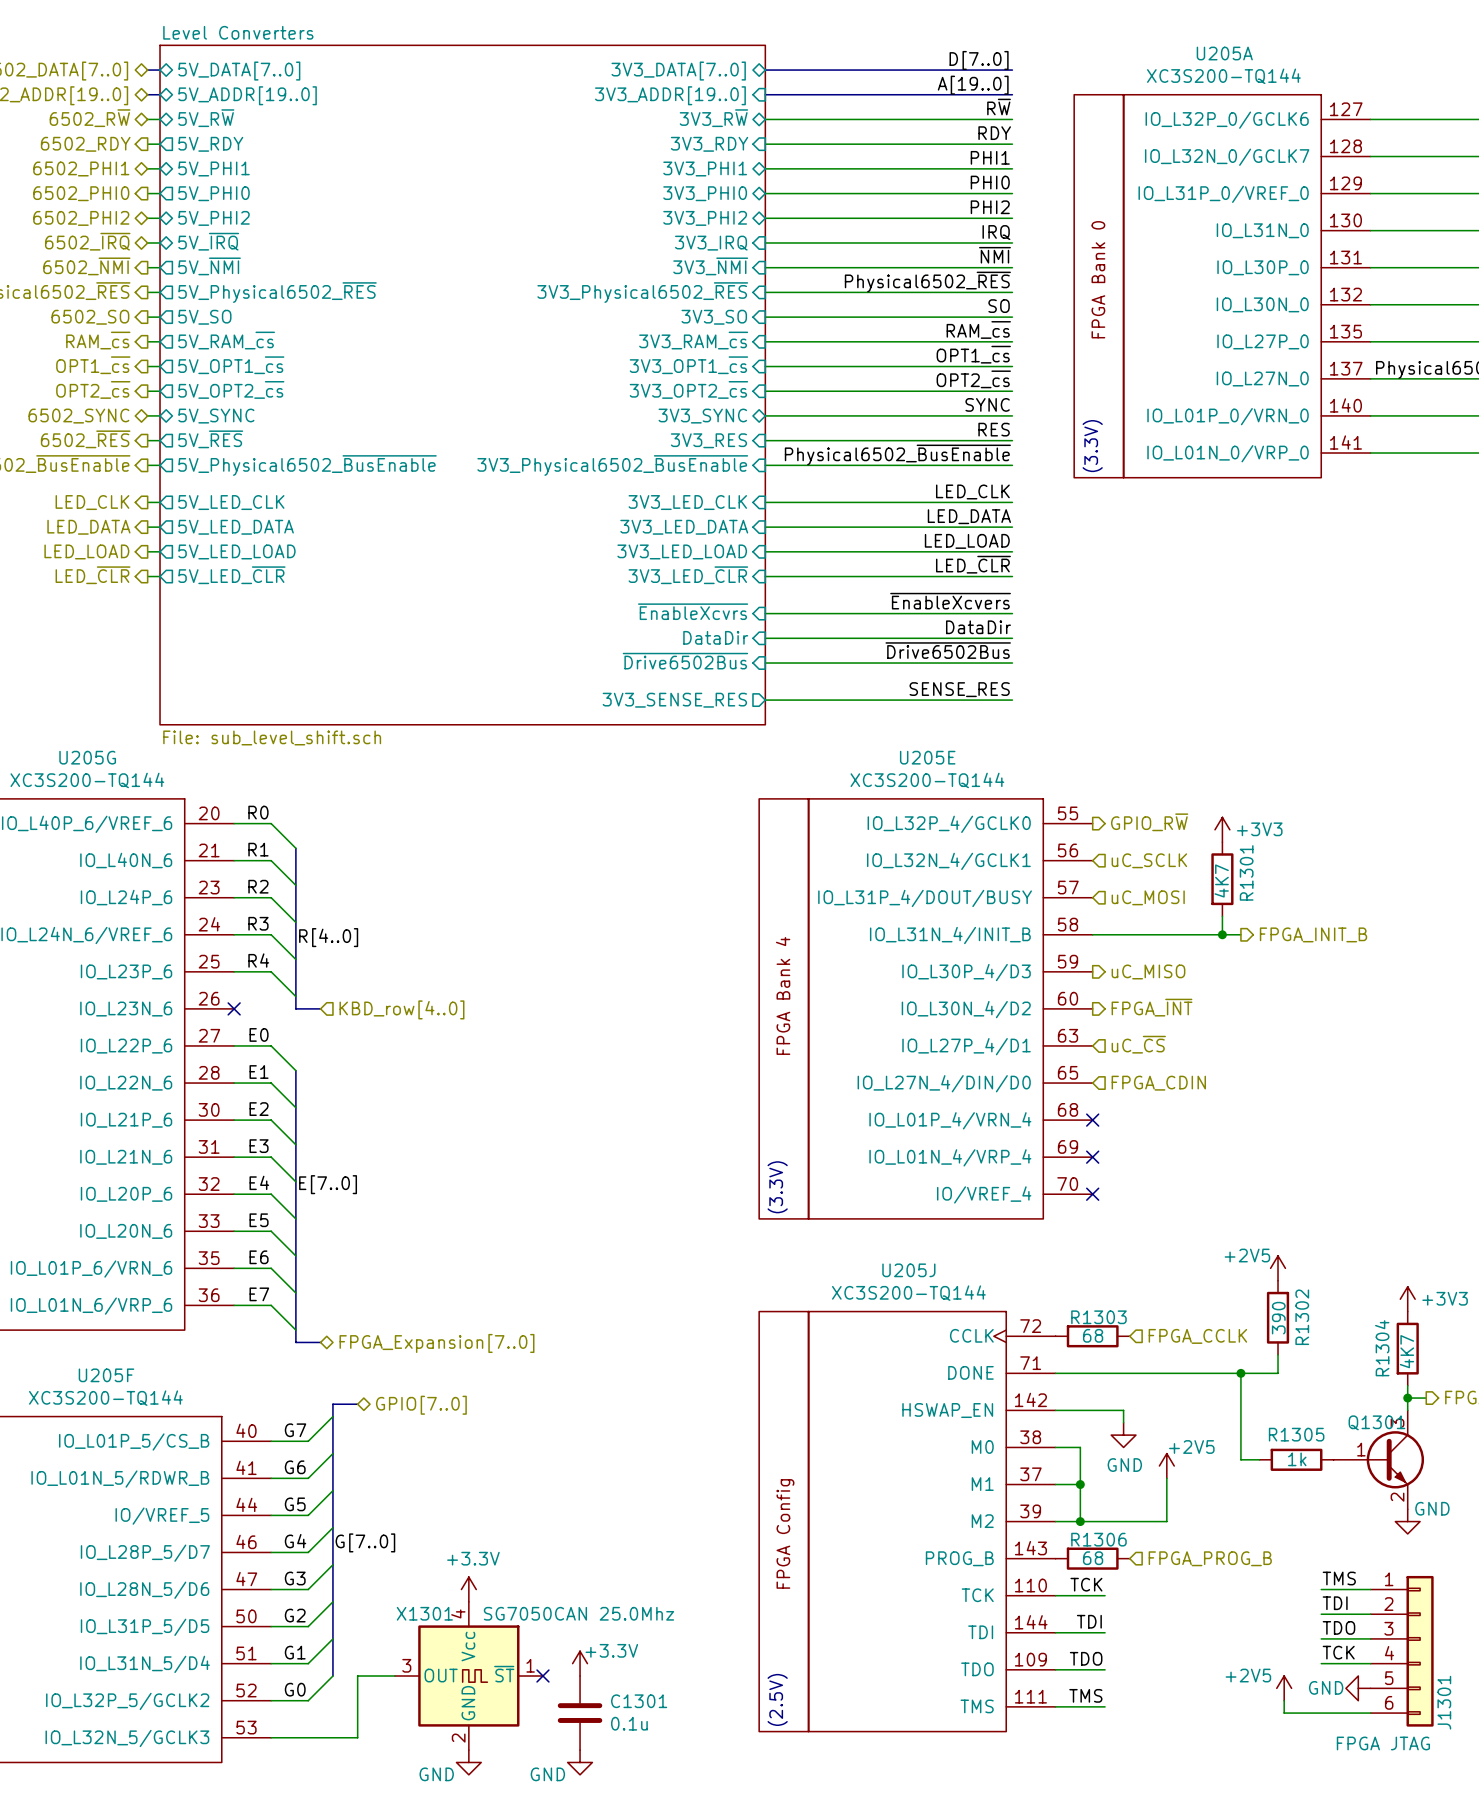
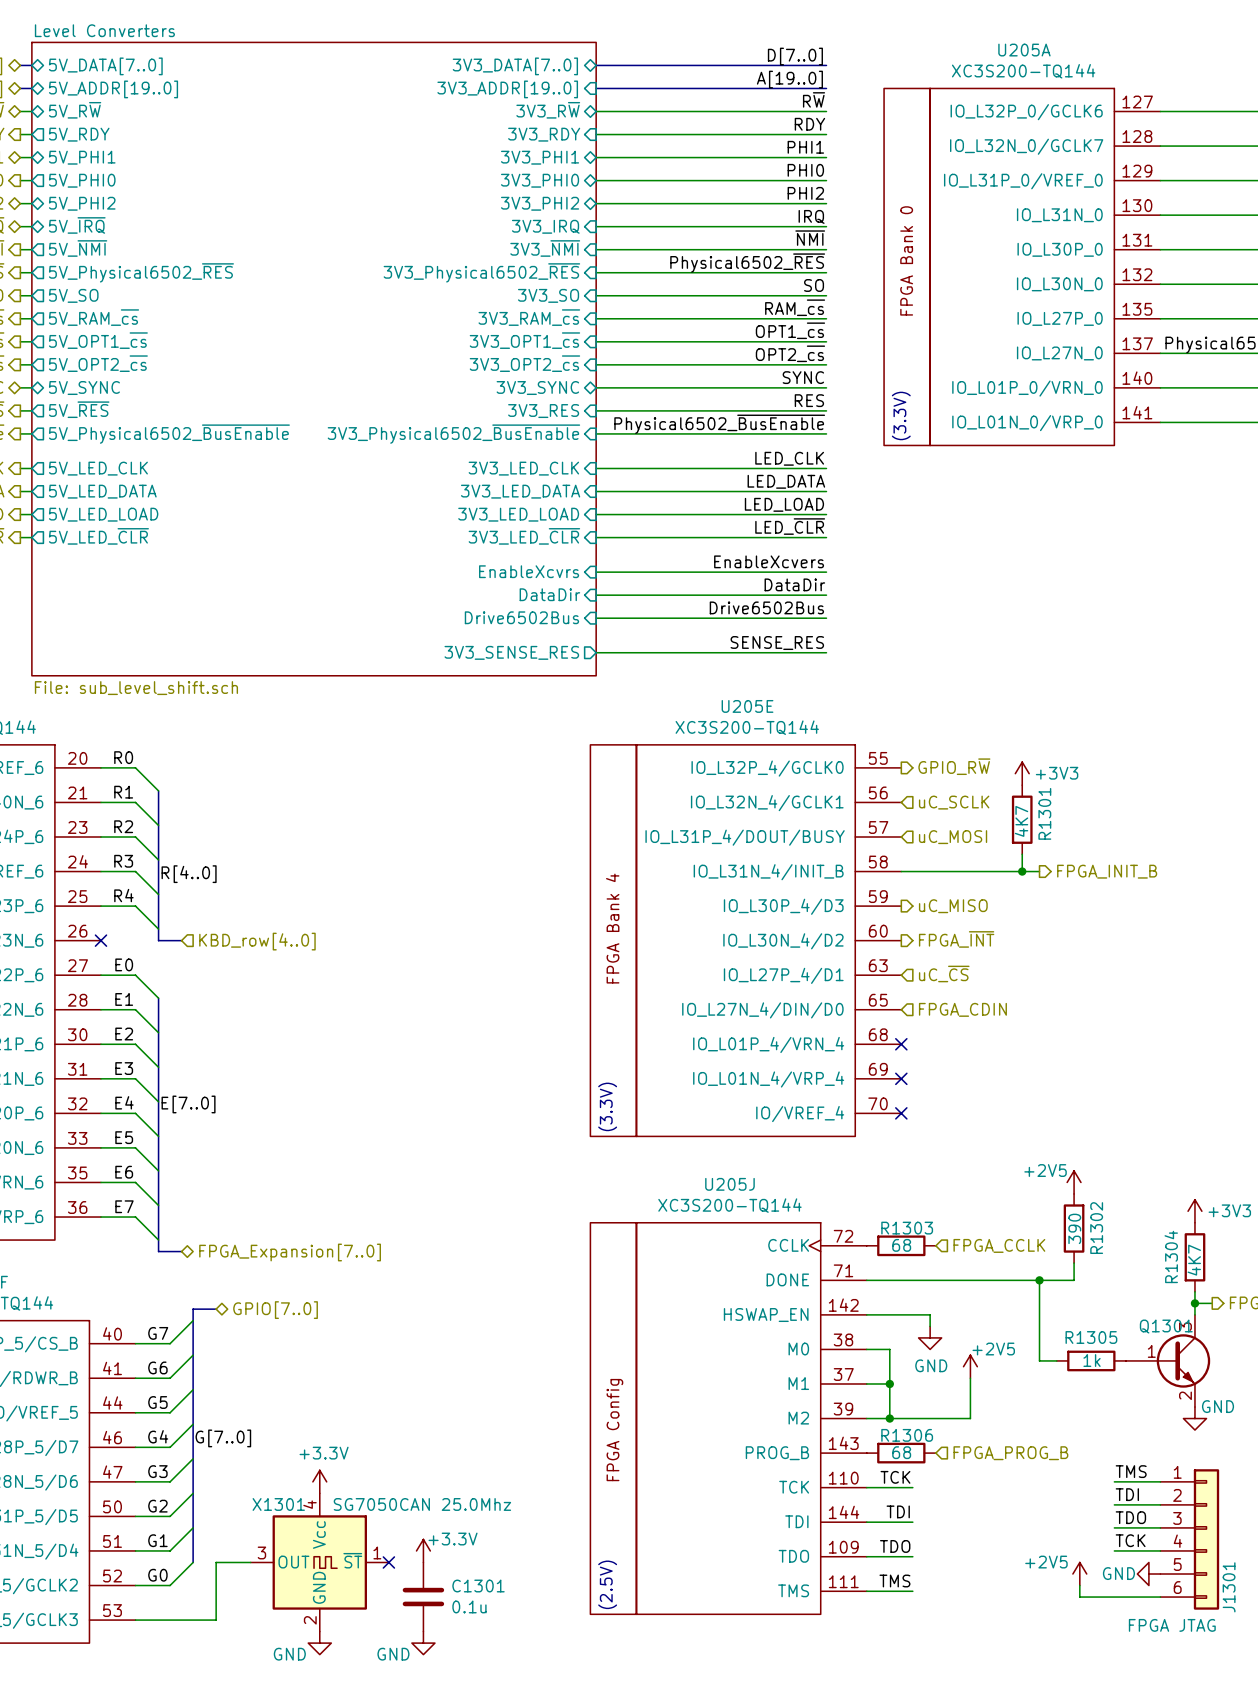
label: ~{EnableXcvers} (950, 601) -> EnableXcvers (769, 561)
sheet pin: ~{EnableXcvrs} (693, 611) -> EnableXcvrs (529, 571)
label: ~{Drive6502Bus} (948, 650) -> Drive6502Bus (766, 607)
sheet pin: ~{Drive6502Bus} (685, 661) -> Drive6502Bus (521, 617)

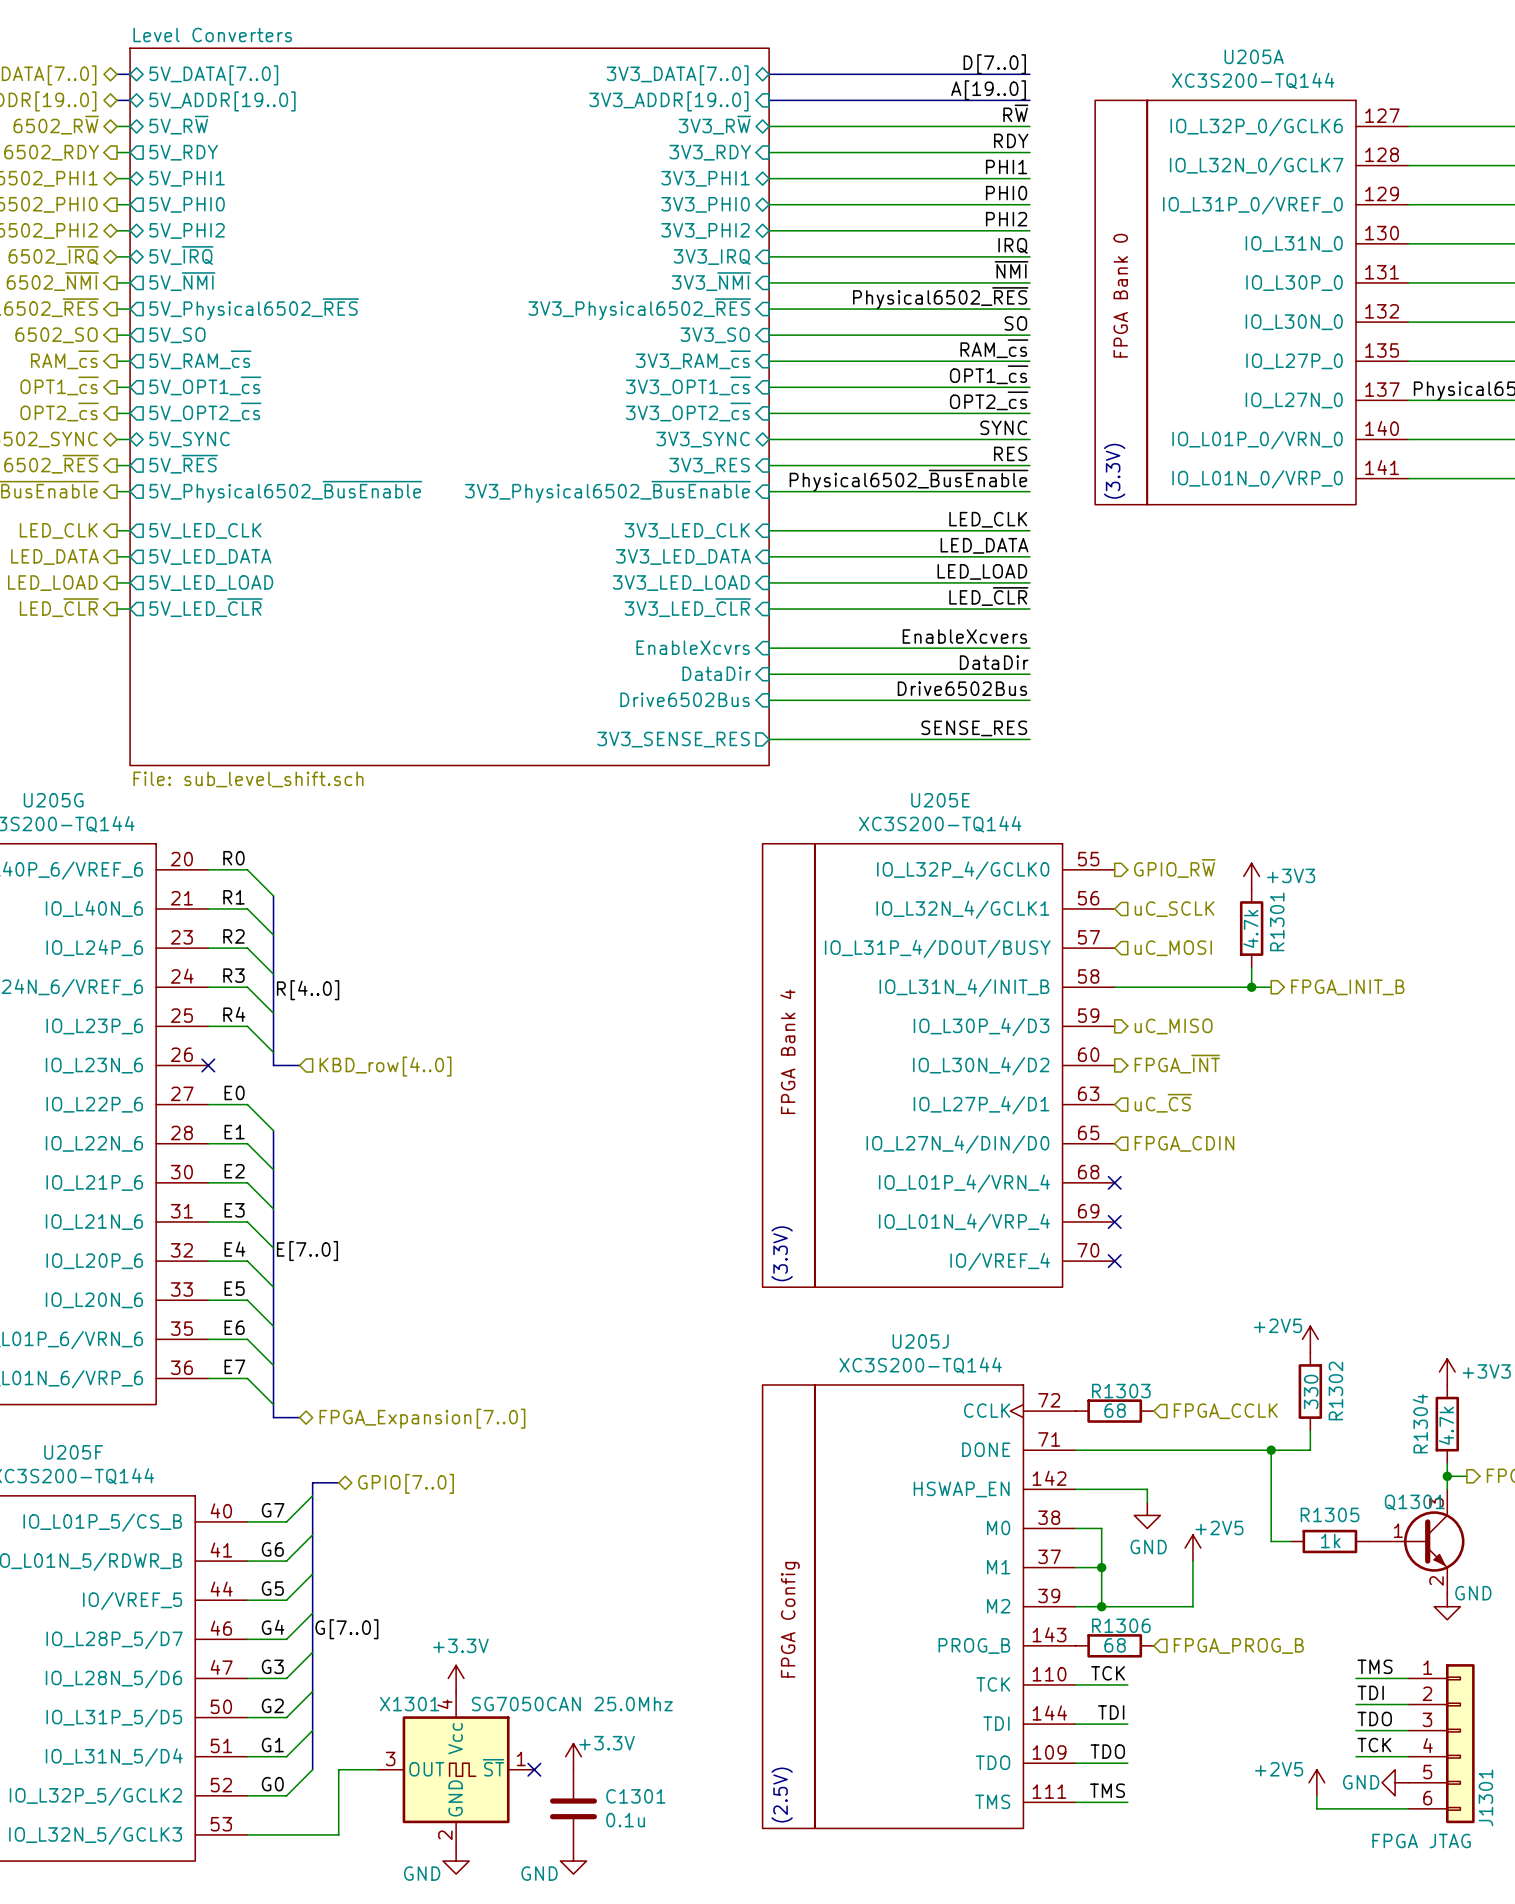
R1301 value: 4K7 (1021, 821) -> 4.7k (1250, 928)
R1302 value: 390 (1074, 1228) -> 330 (1311, 1391)
R1304 value: 4K7 (1194, 1260) -> 4.7k (1446, 1425)

